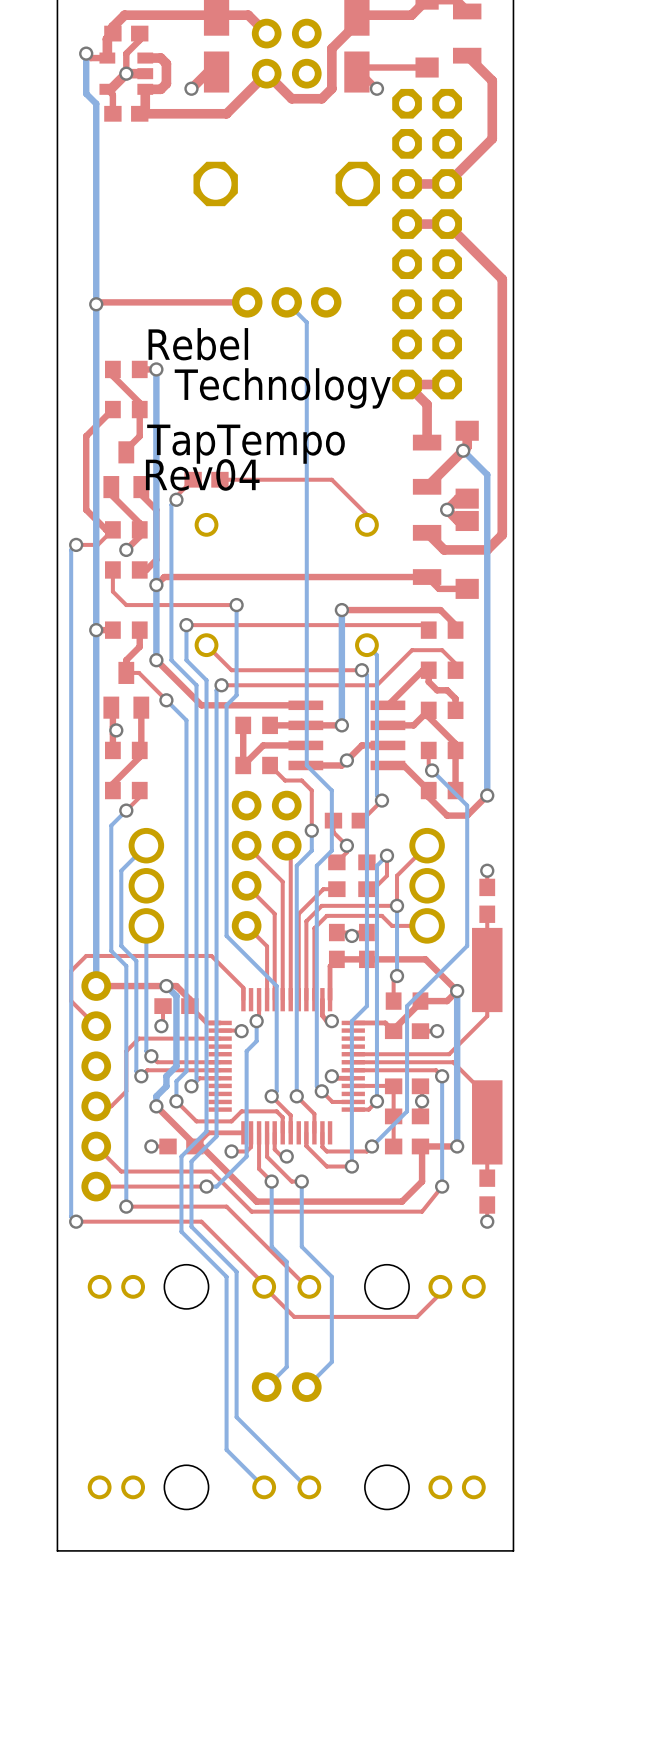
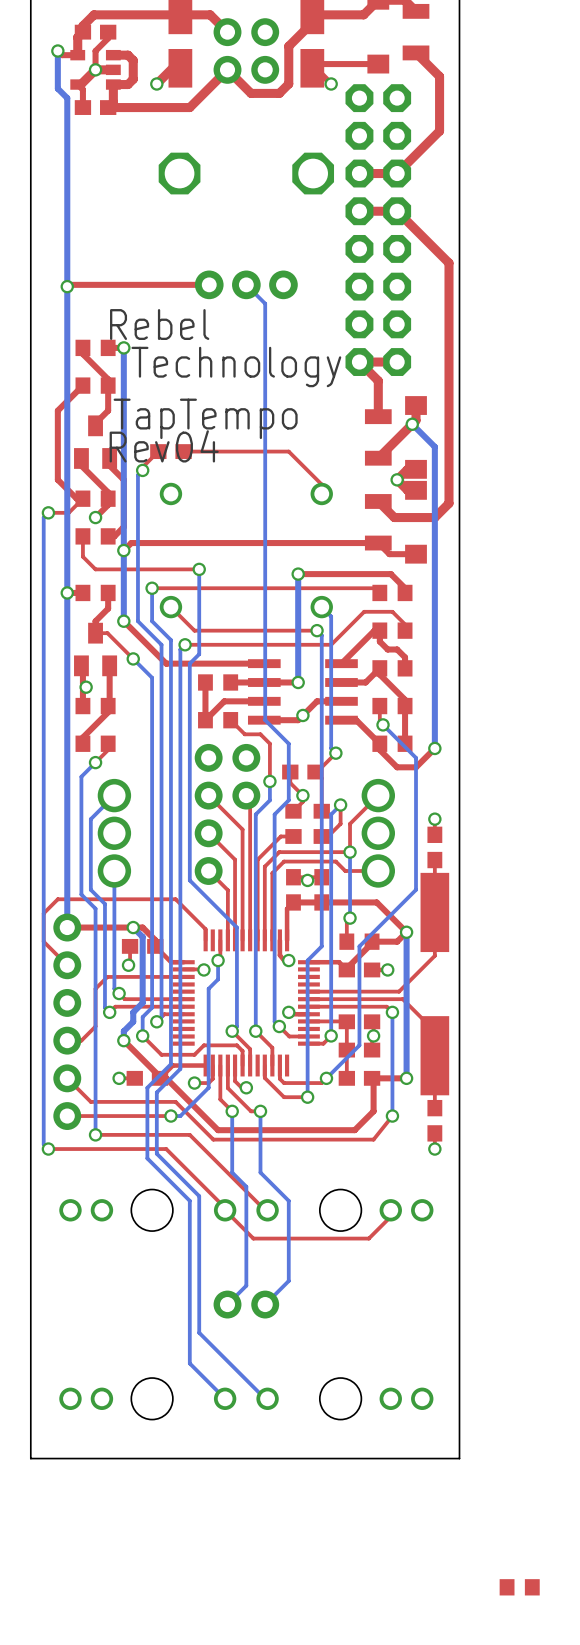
part: none -> (519, 1587)

